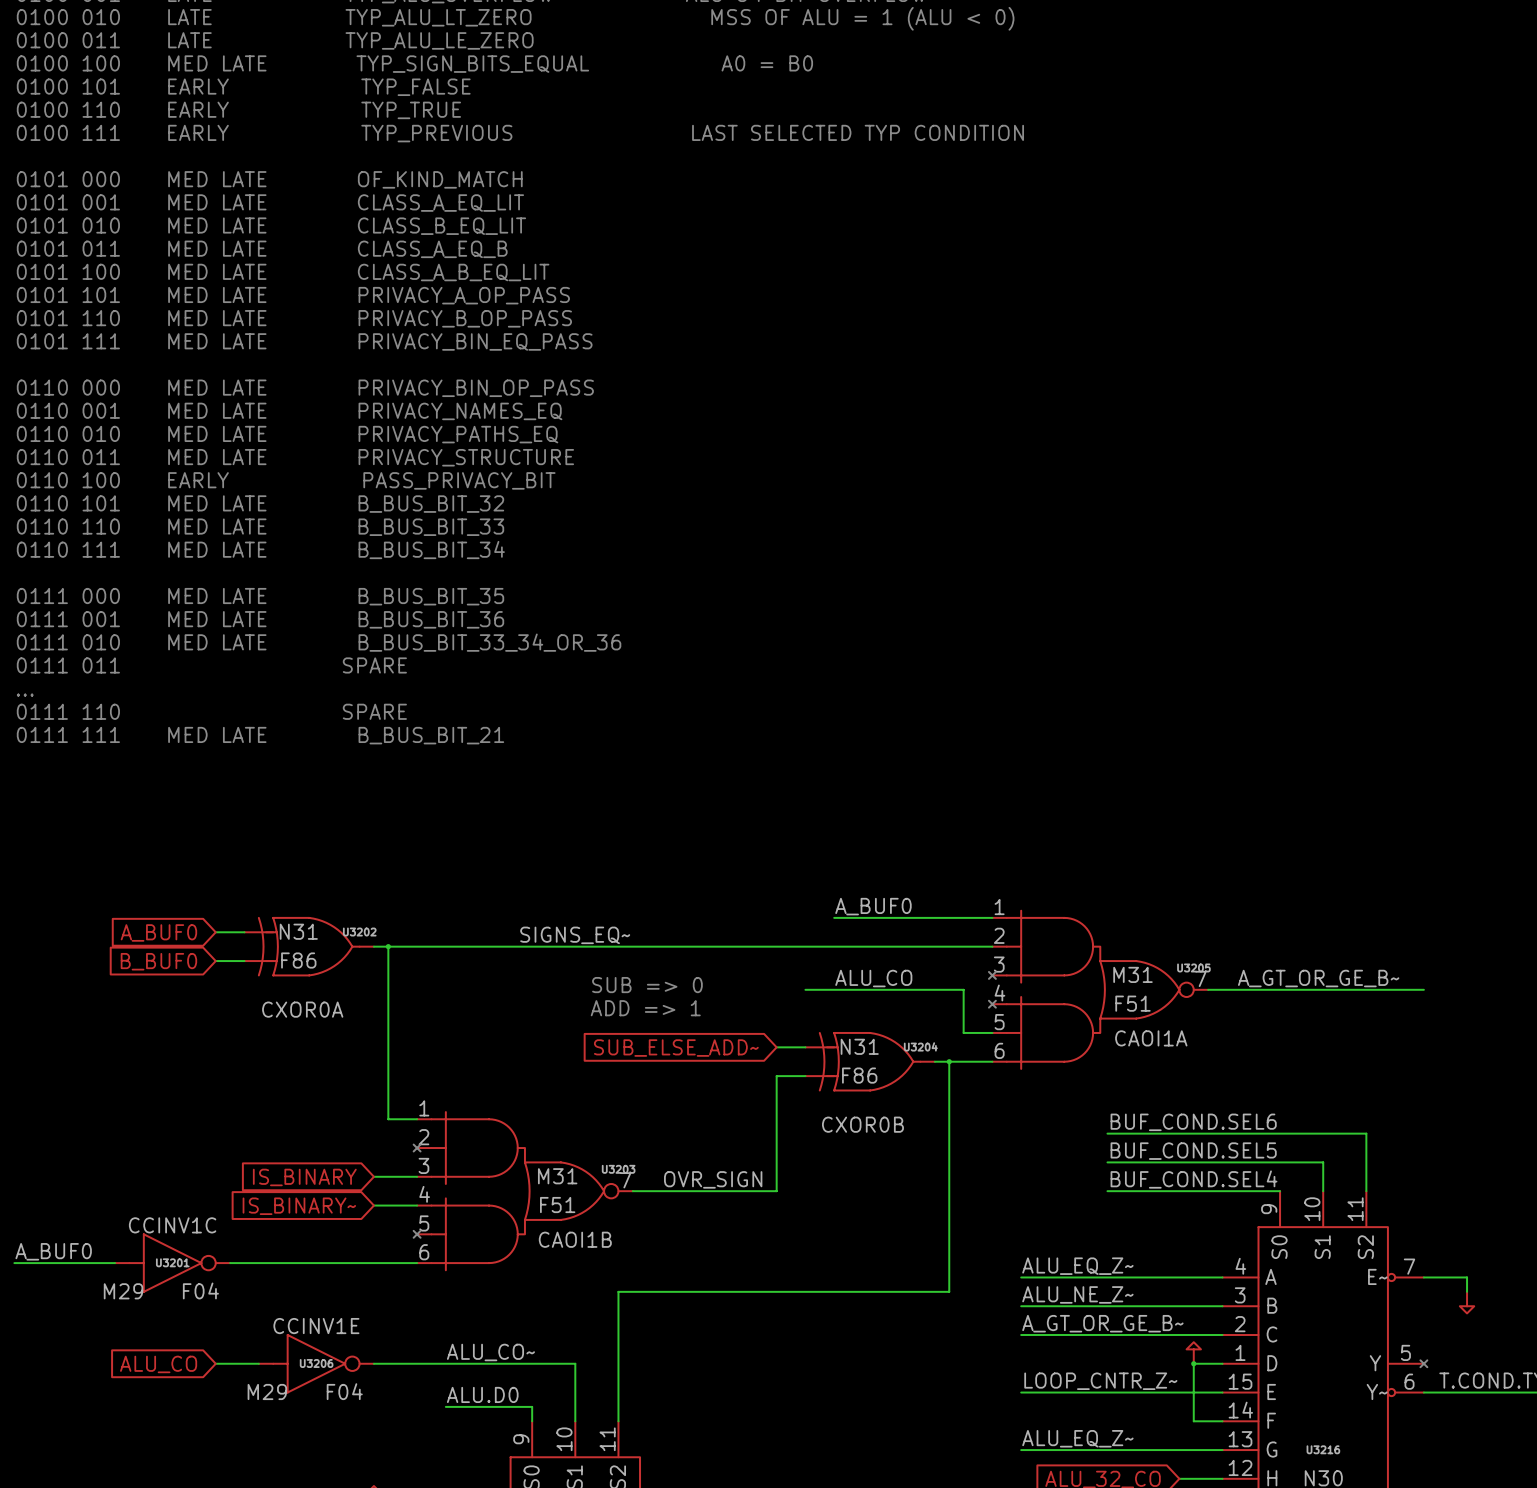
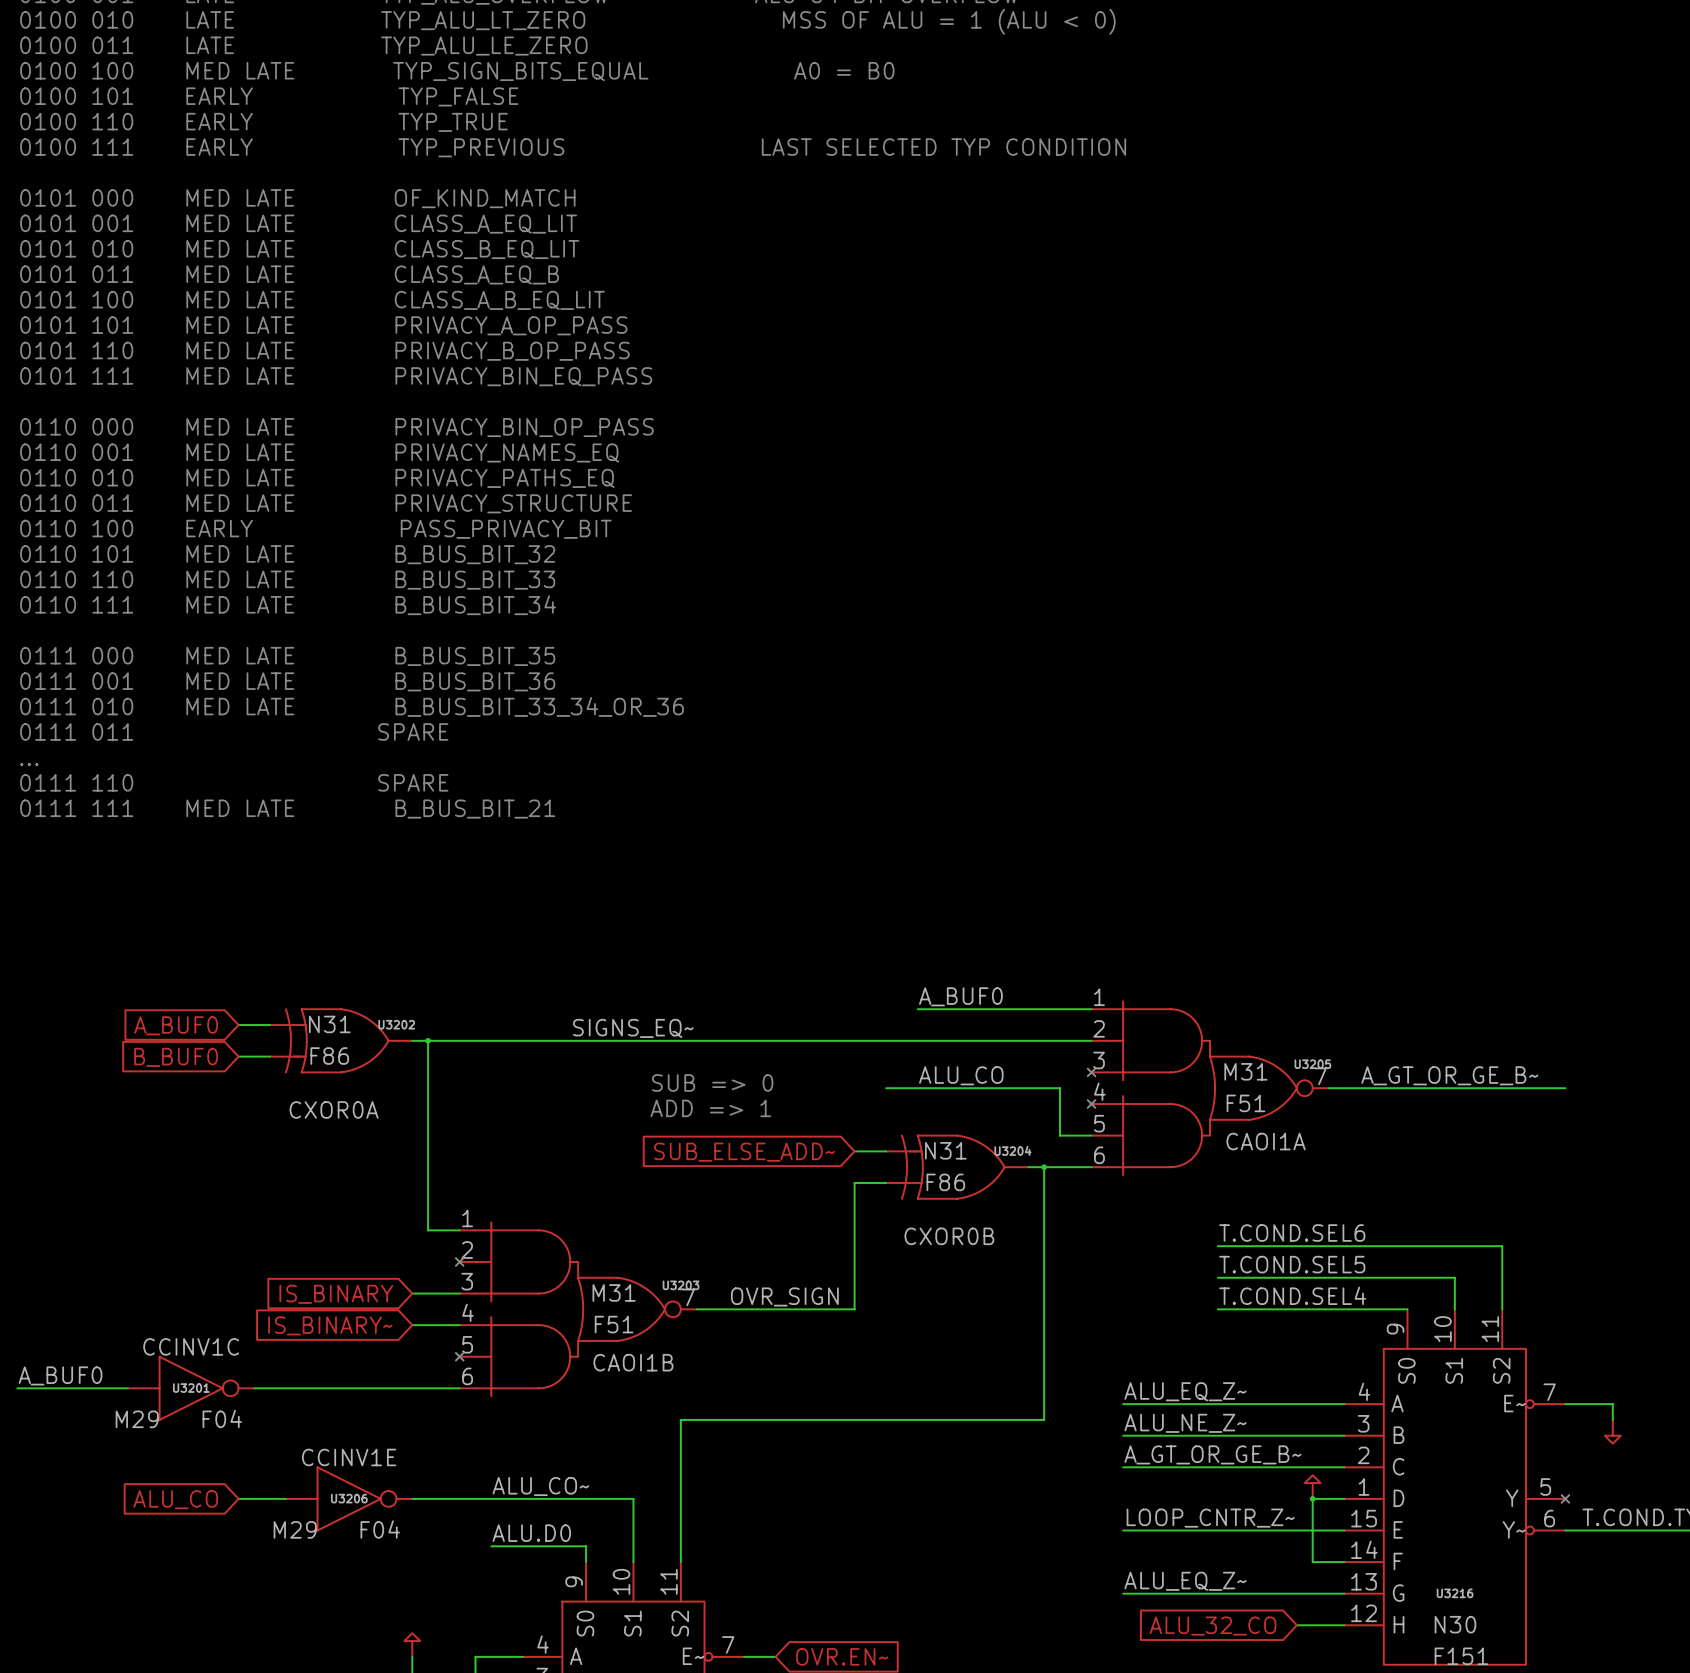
label: BUF_COND.SEL6 (1193, 1122) -> T.COND.SEL6 (1292, 1233)
label: BUF_COND.SEL5 (1193, 1151) -> T.COND.SEL5 (1292, 1264)
label: BUF_COND.SEL4 (1193, 1179) -> T.COND.SEL4 (1292, 1295)

